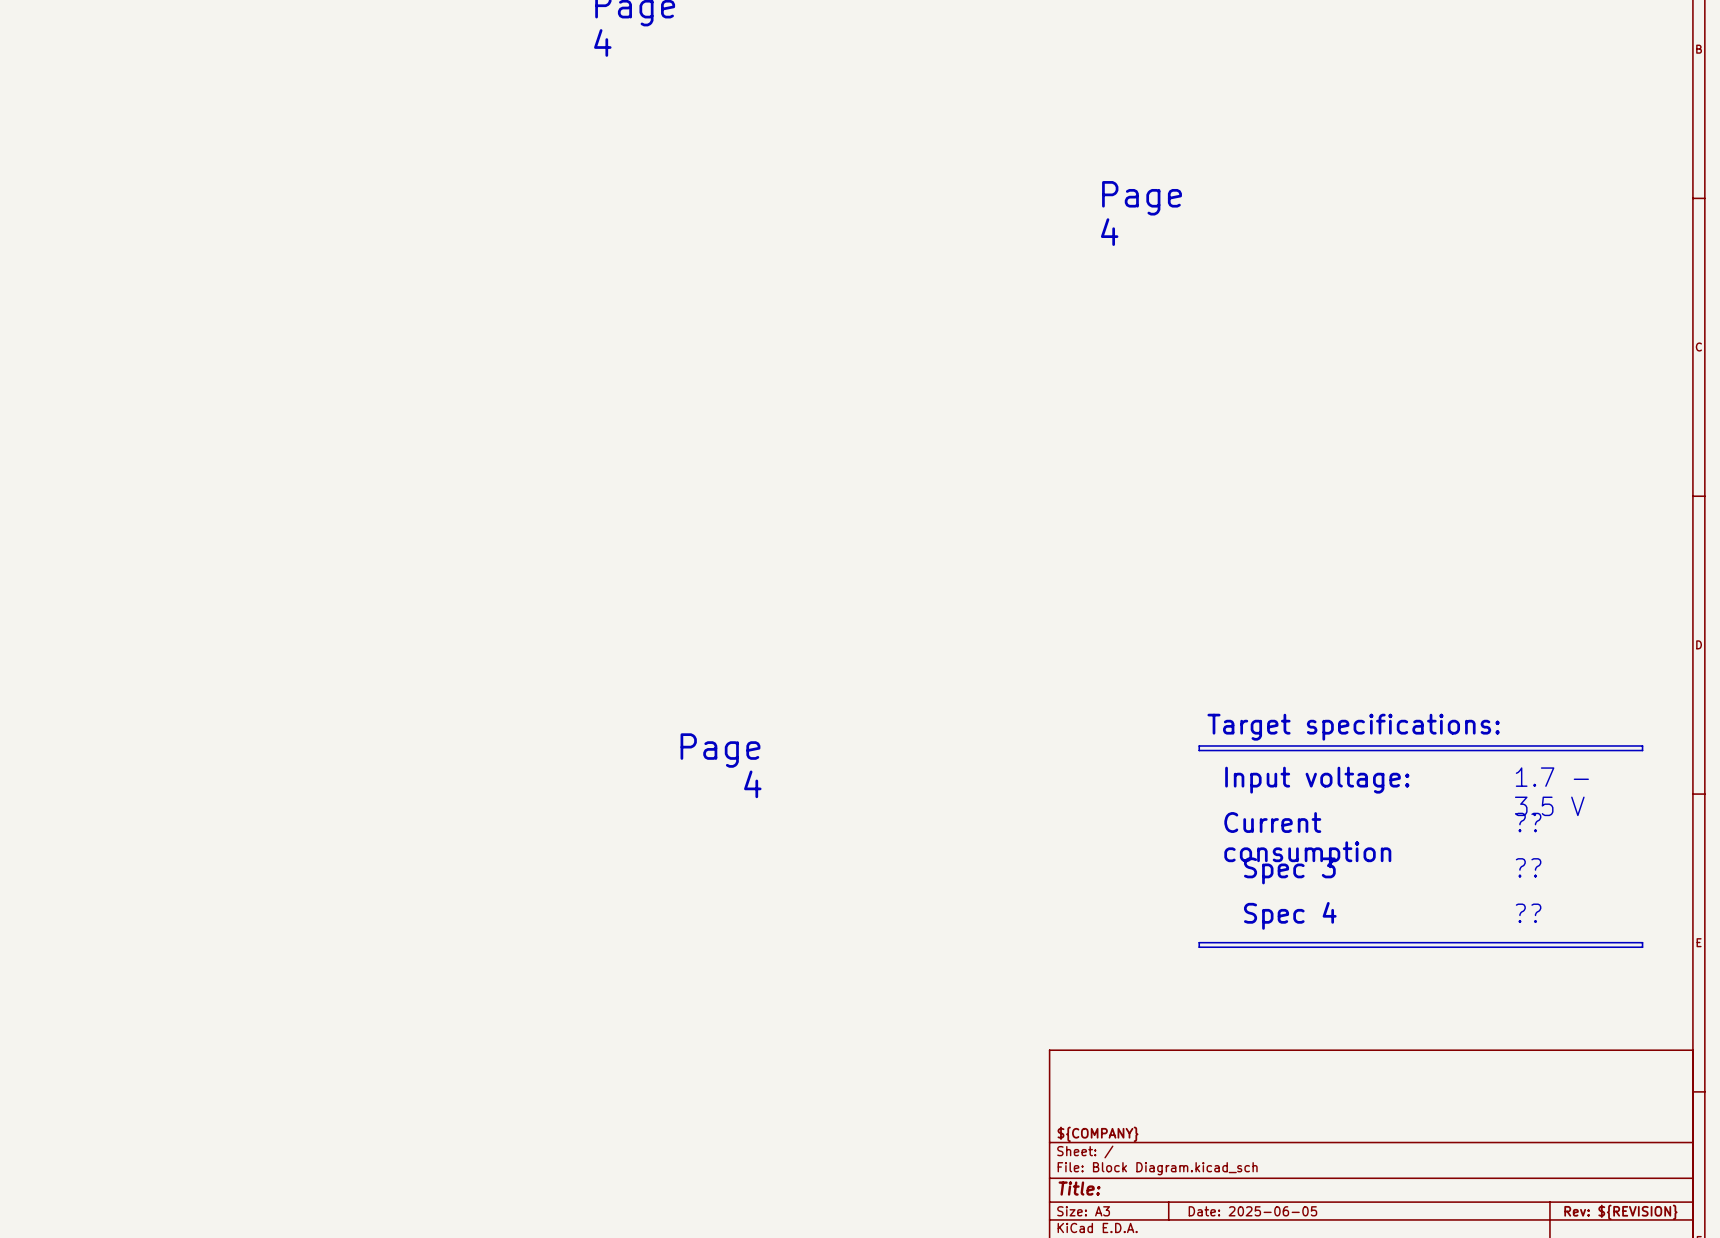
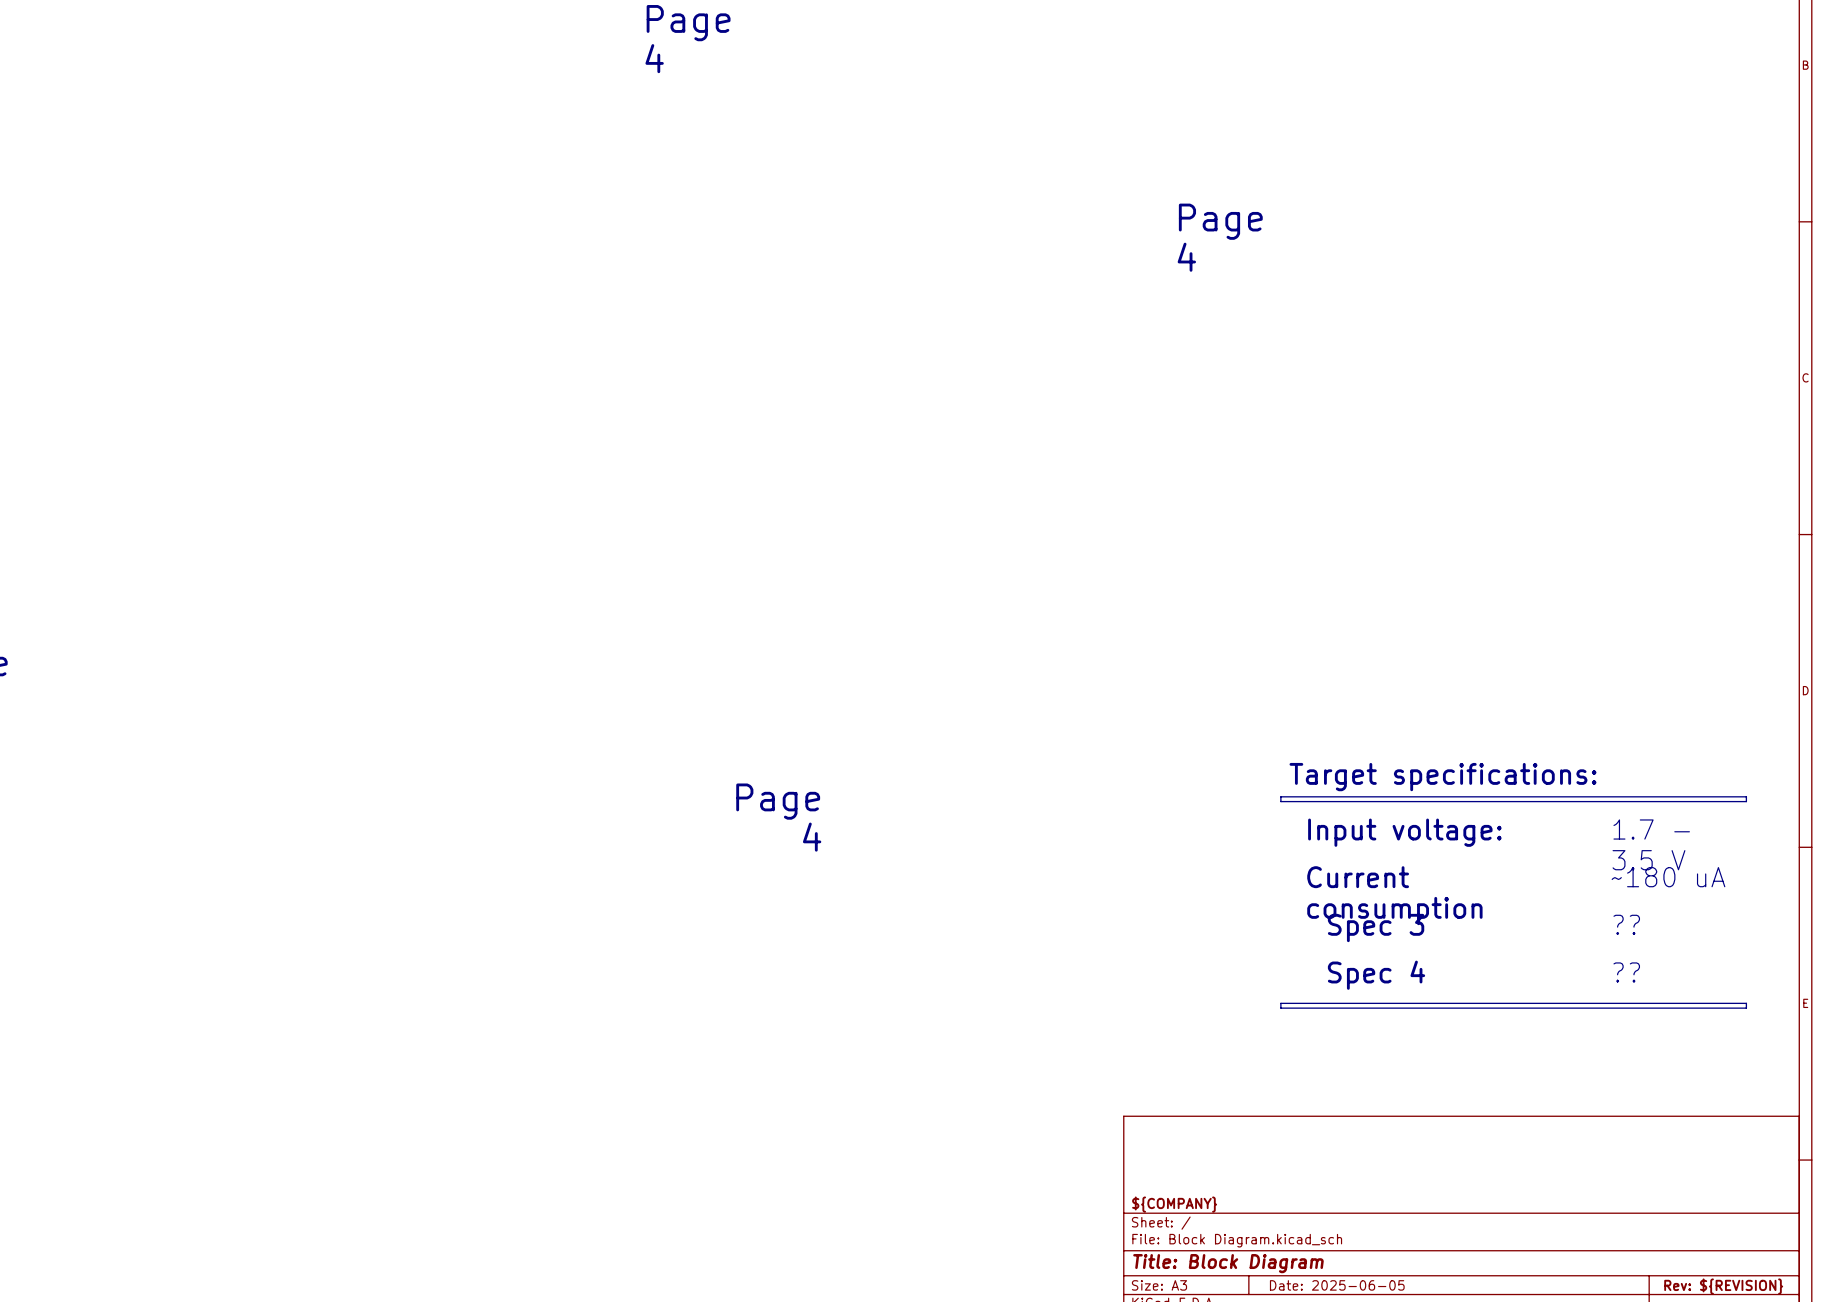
text: ?? (1528, 822) -> ~180 uA (1668, 877)
title block: Title: (1079, 1188) -> Title: Block Diagram (1228, 1263)

